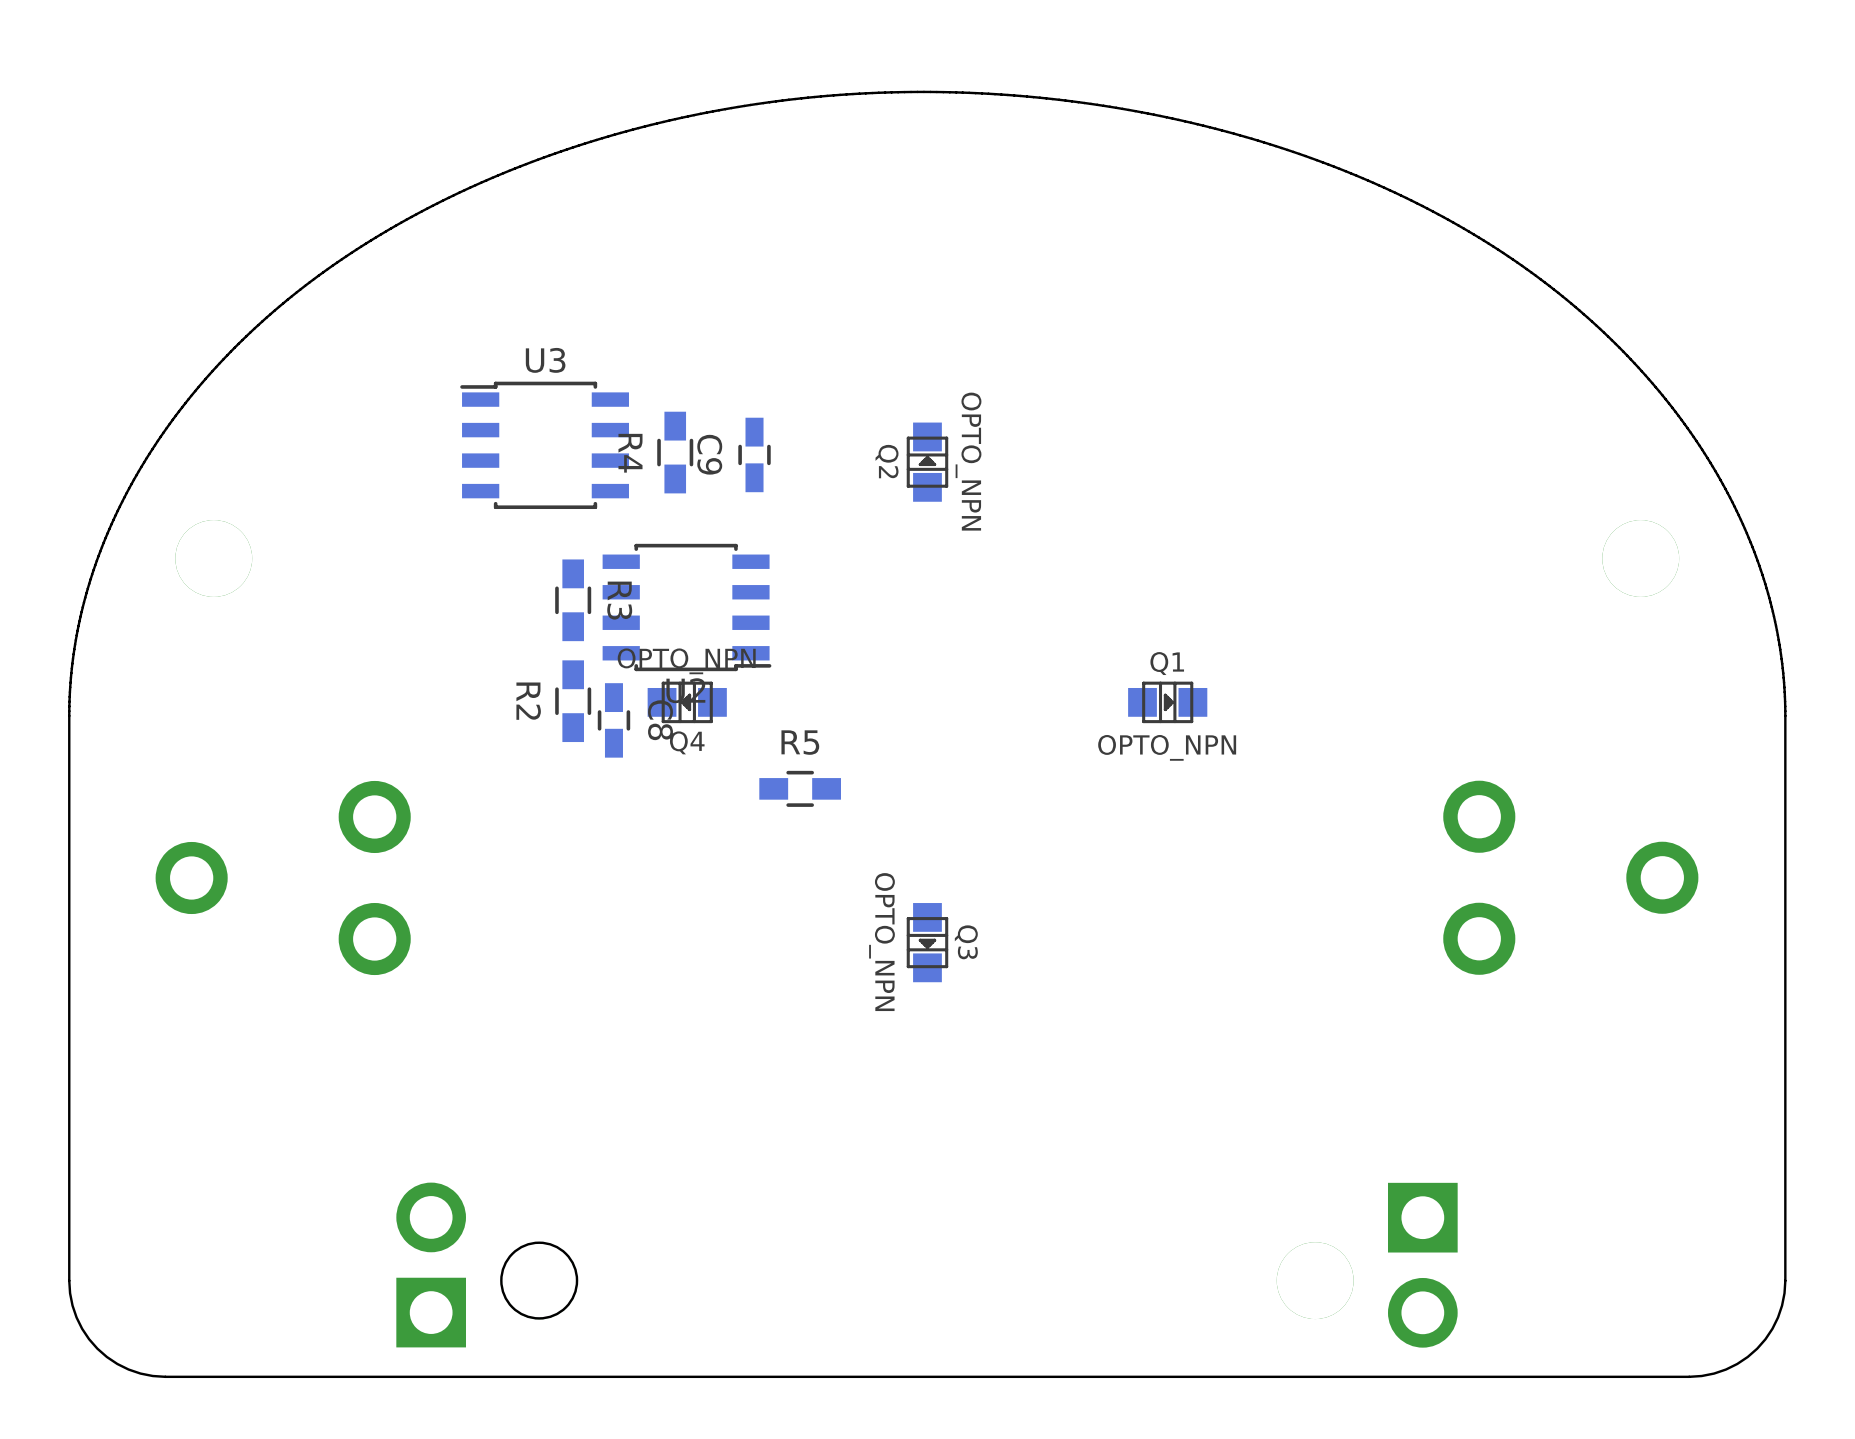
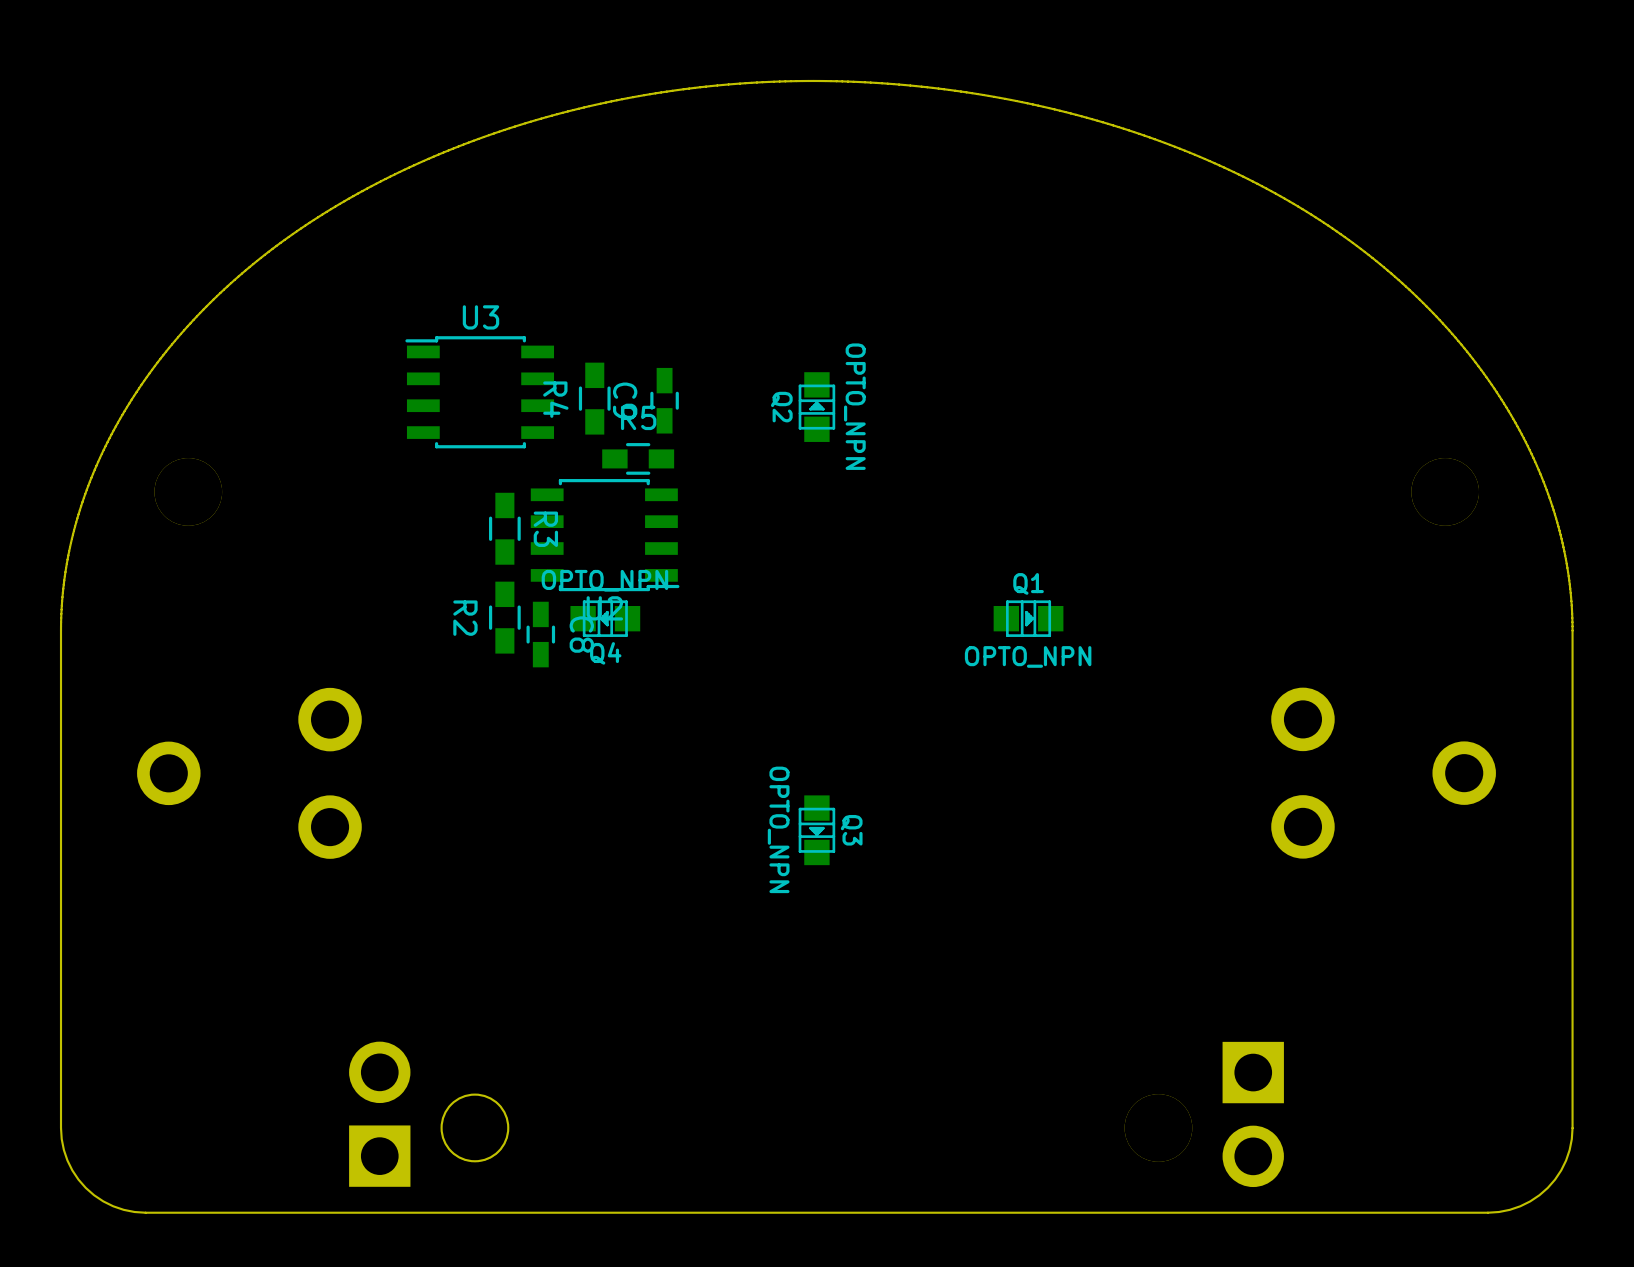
R5 position: (800, 788) -> (638, 458)

